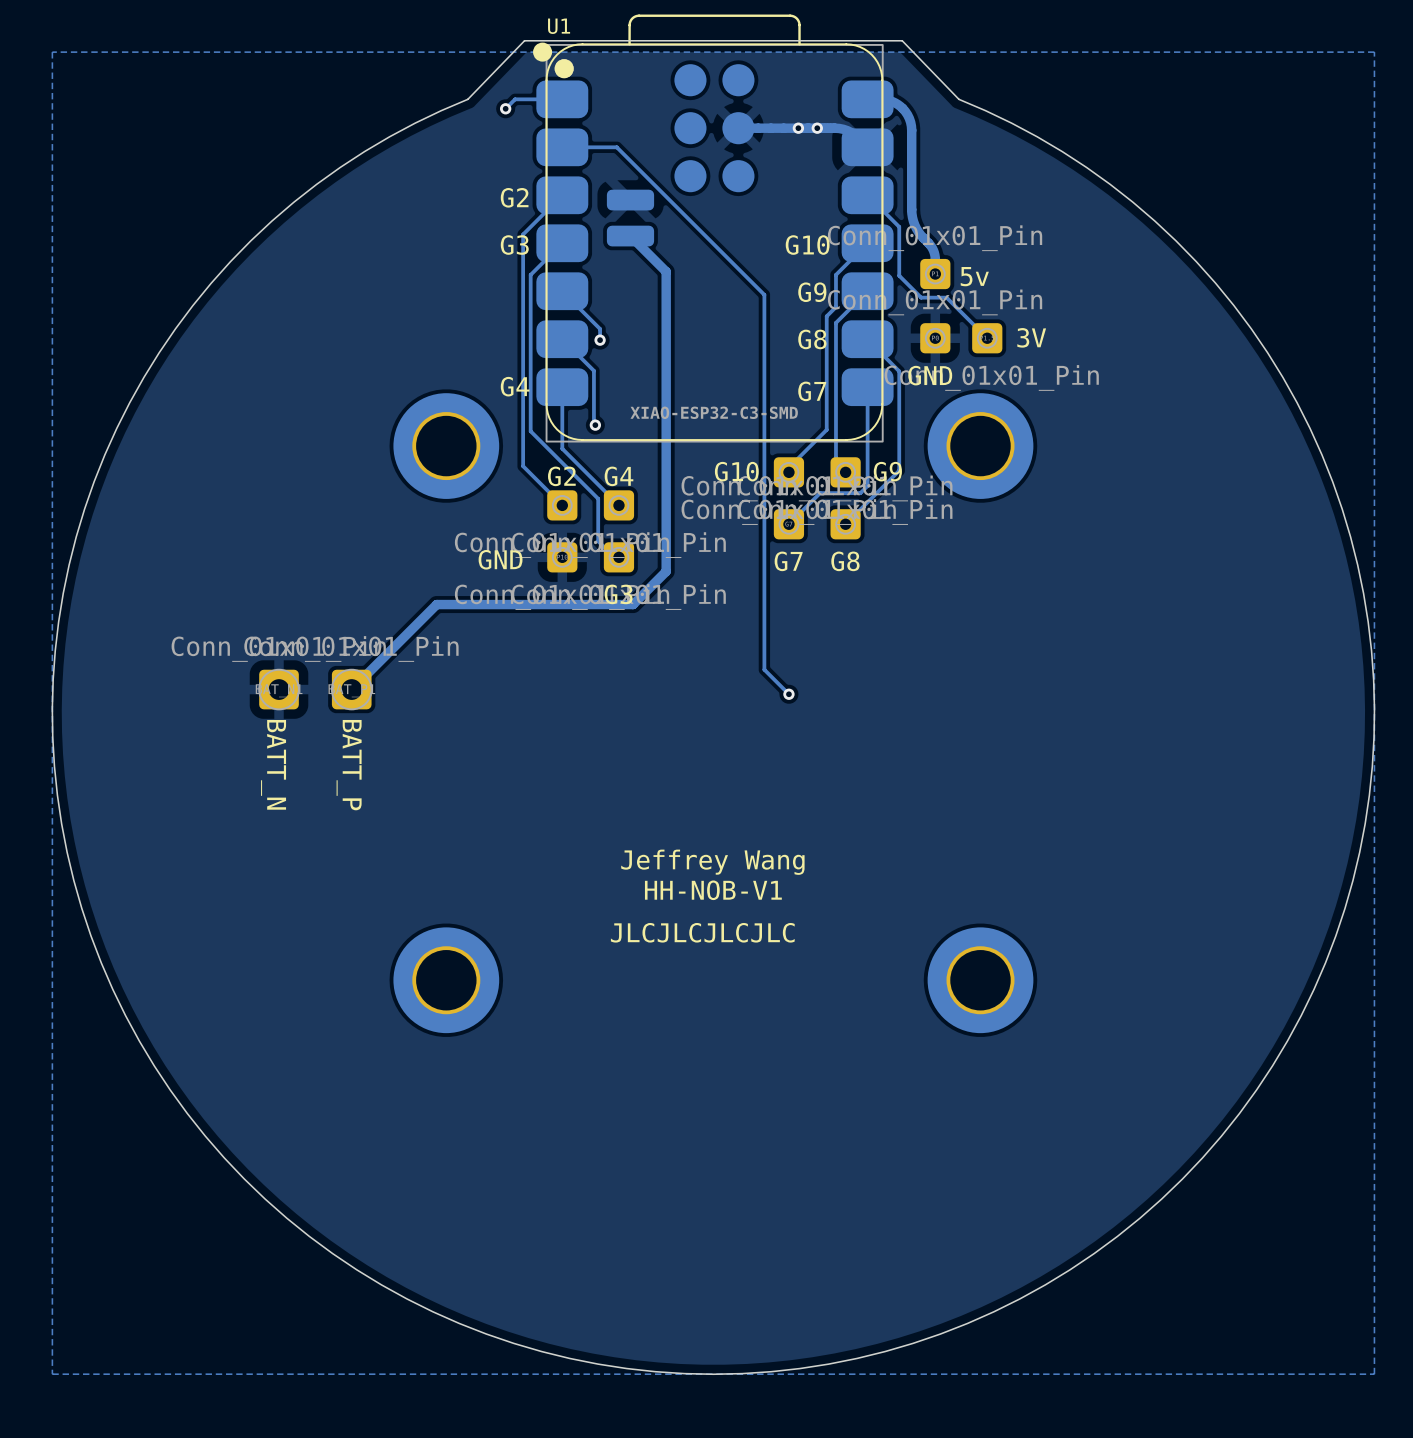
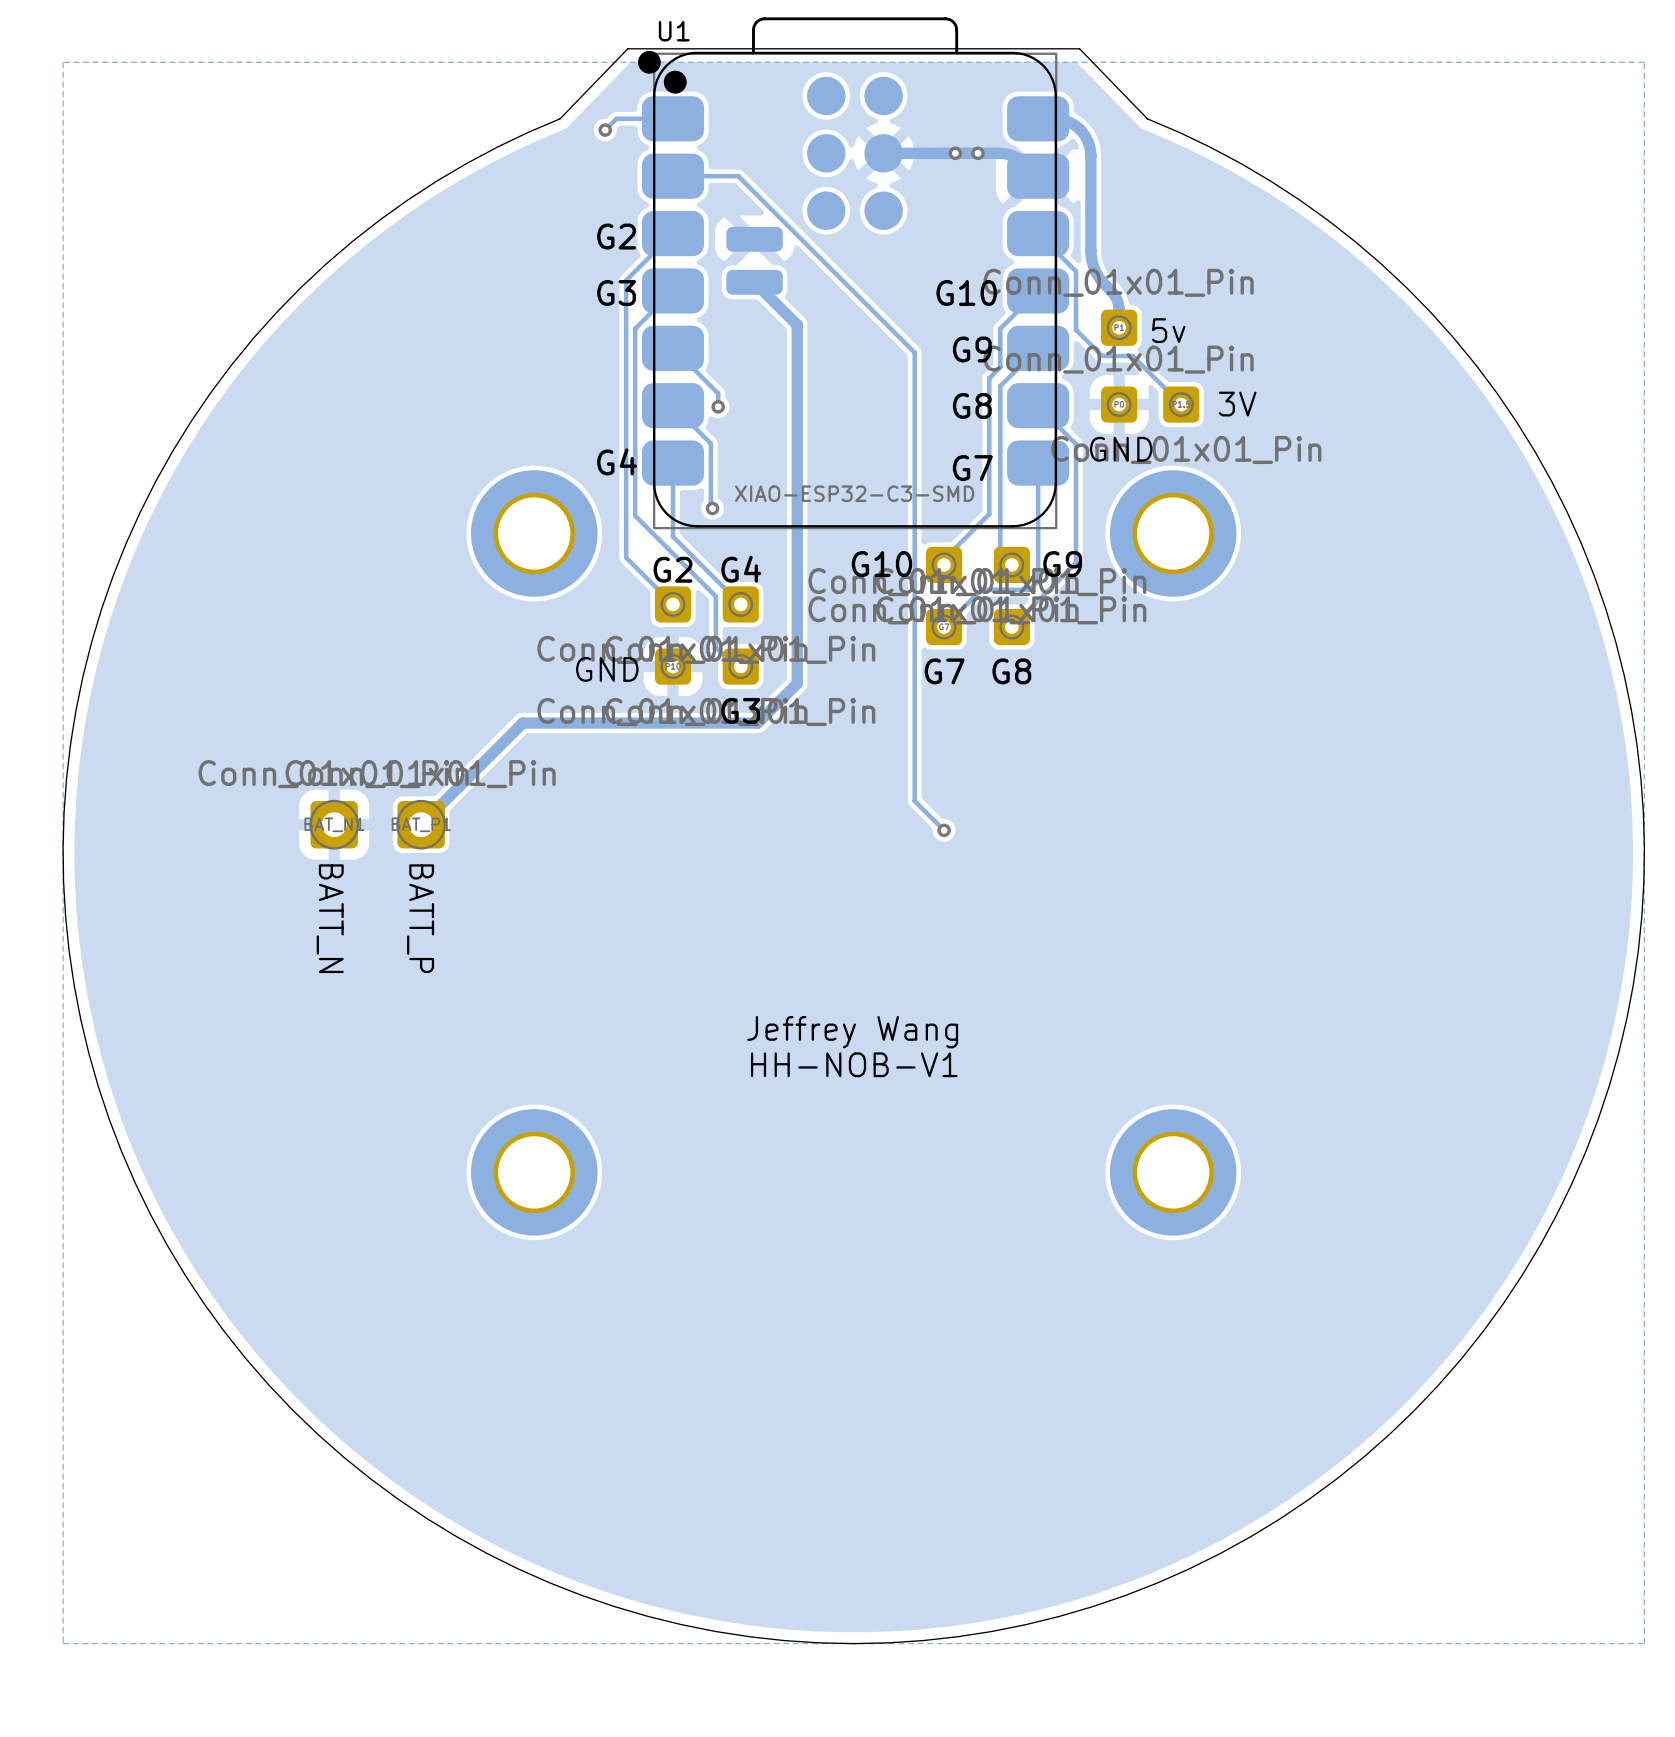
text: JLCJLCJLCJLC (702, 932) -> none

